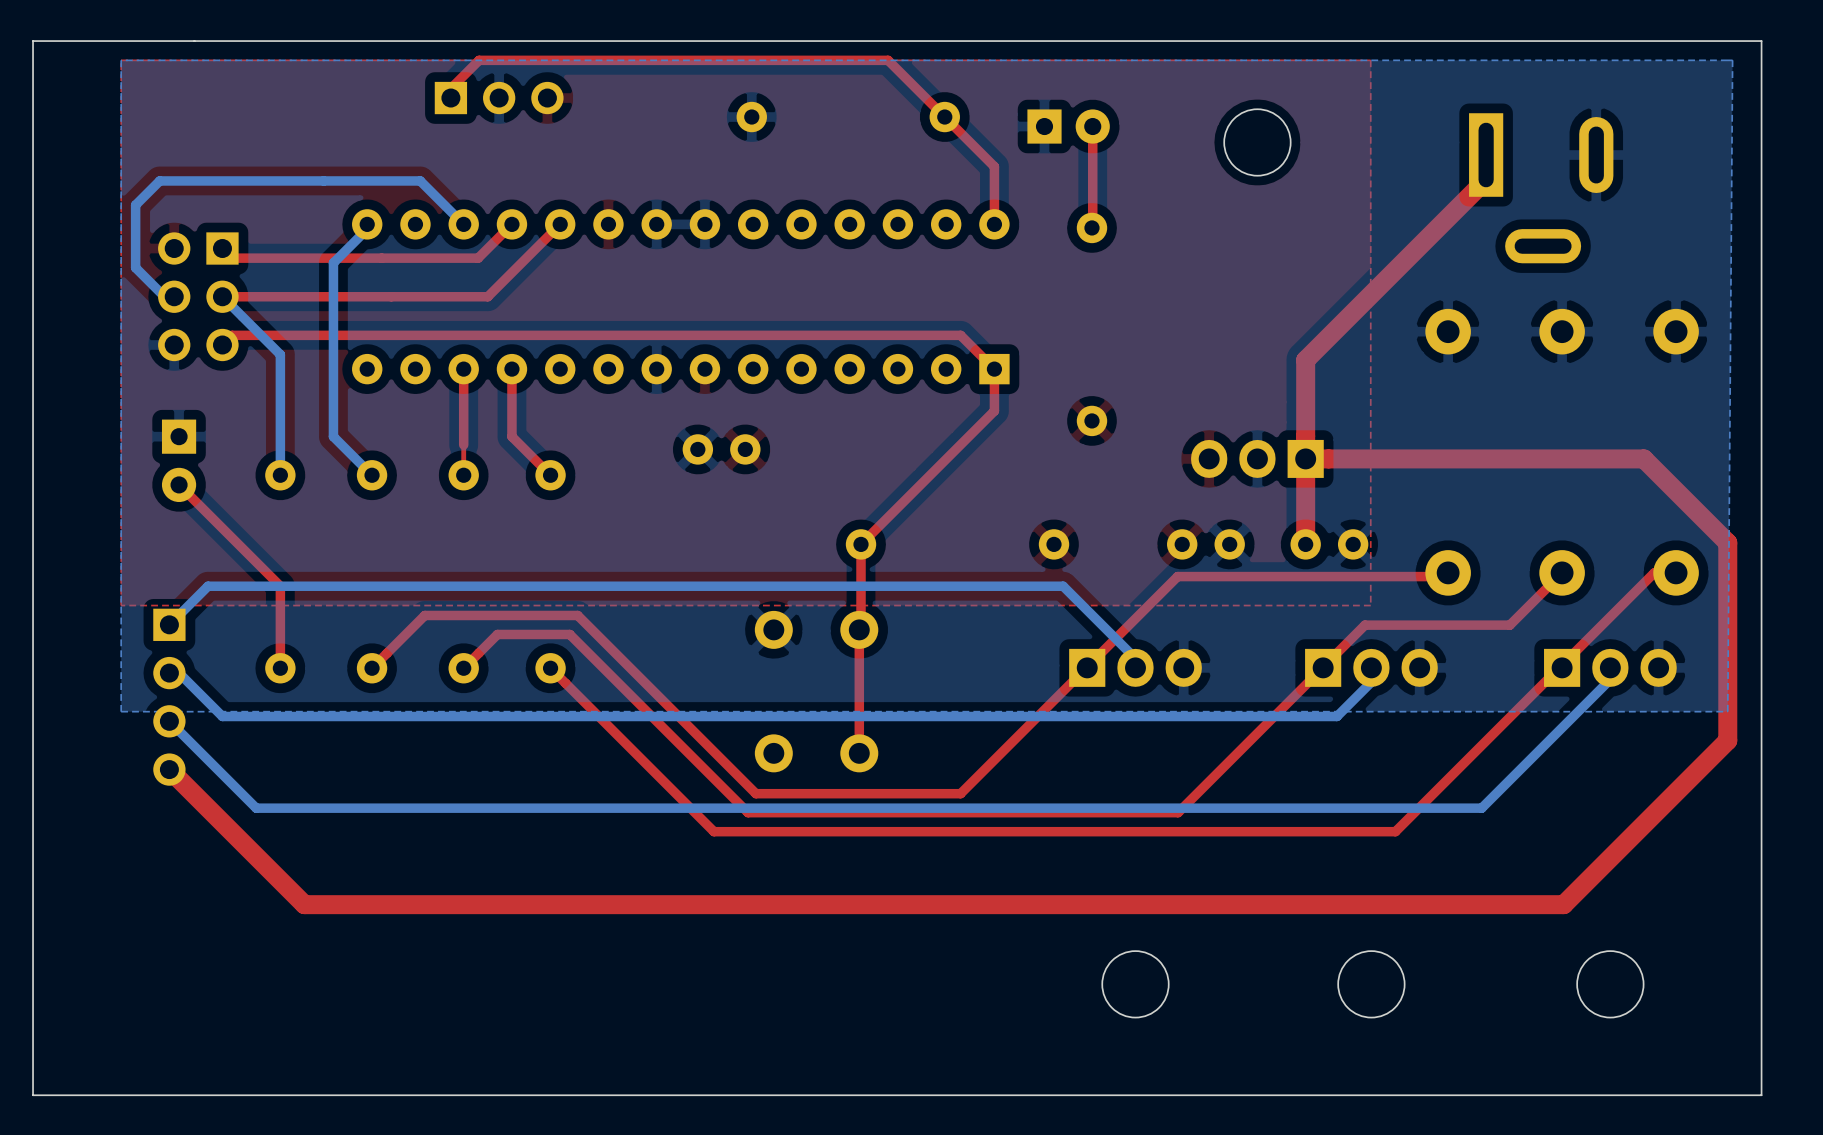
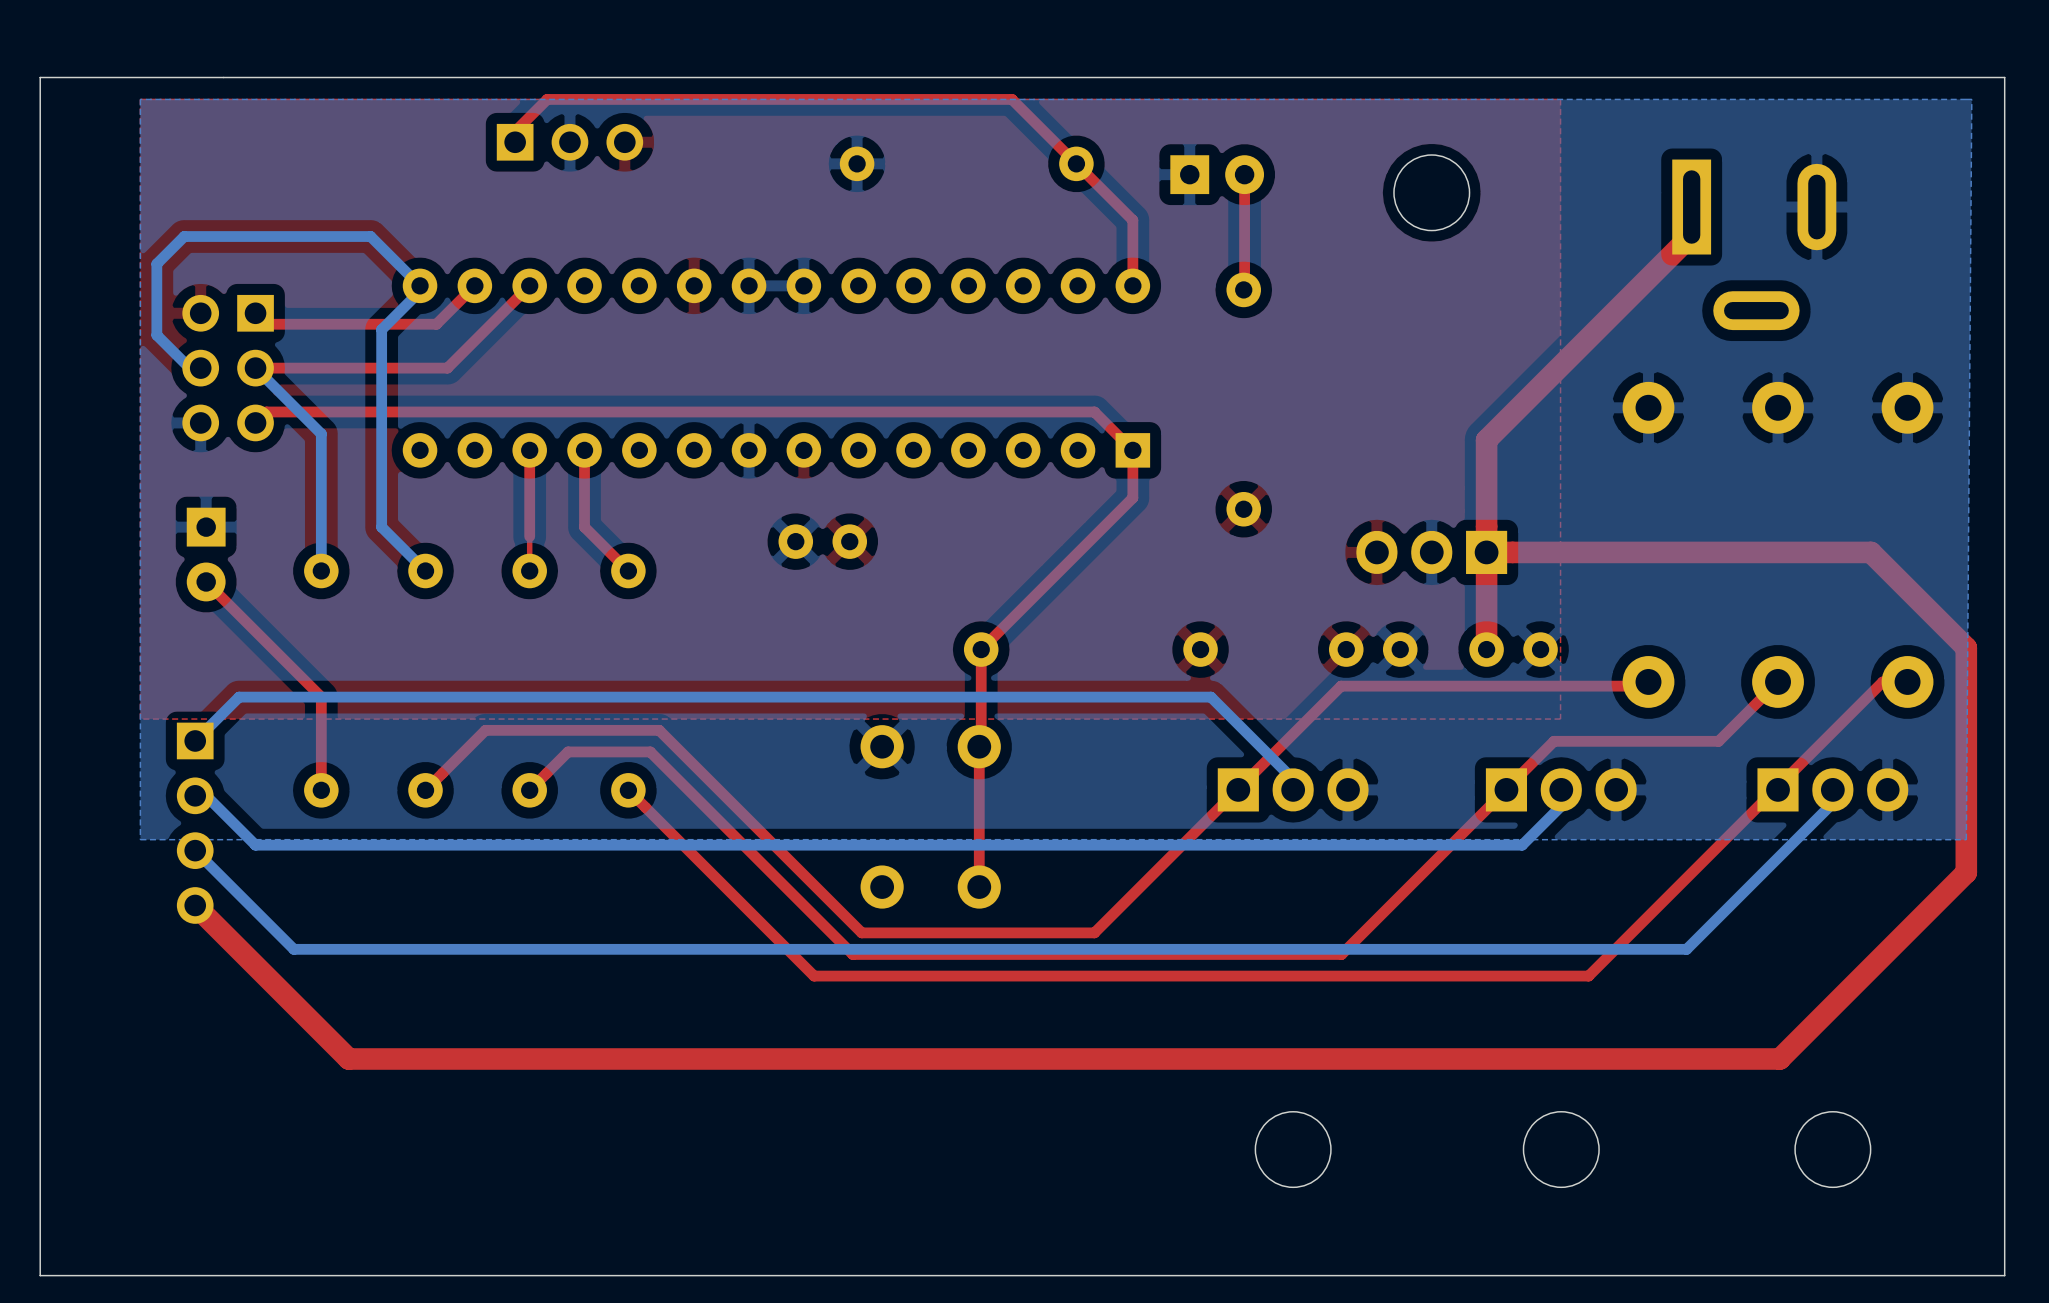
bottom track: (323, 180) (420, 180) (463, 224) -> (370, 236) (420, 285)
top track: (511, 224) (478, 258) (381, 258) -> (474, 285) (436, 324)
top track: (560, 224) (487, 296) (391, 296) -> (529, 285) (447, 368)

